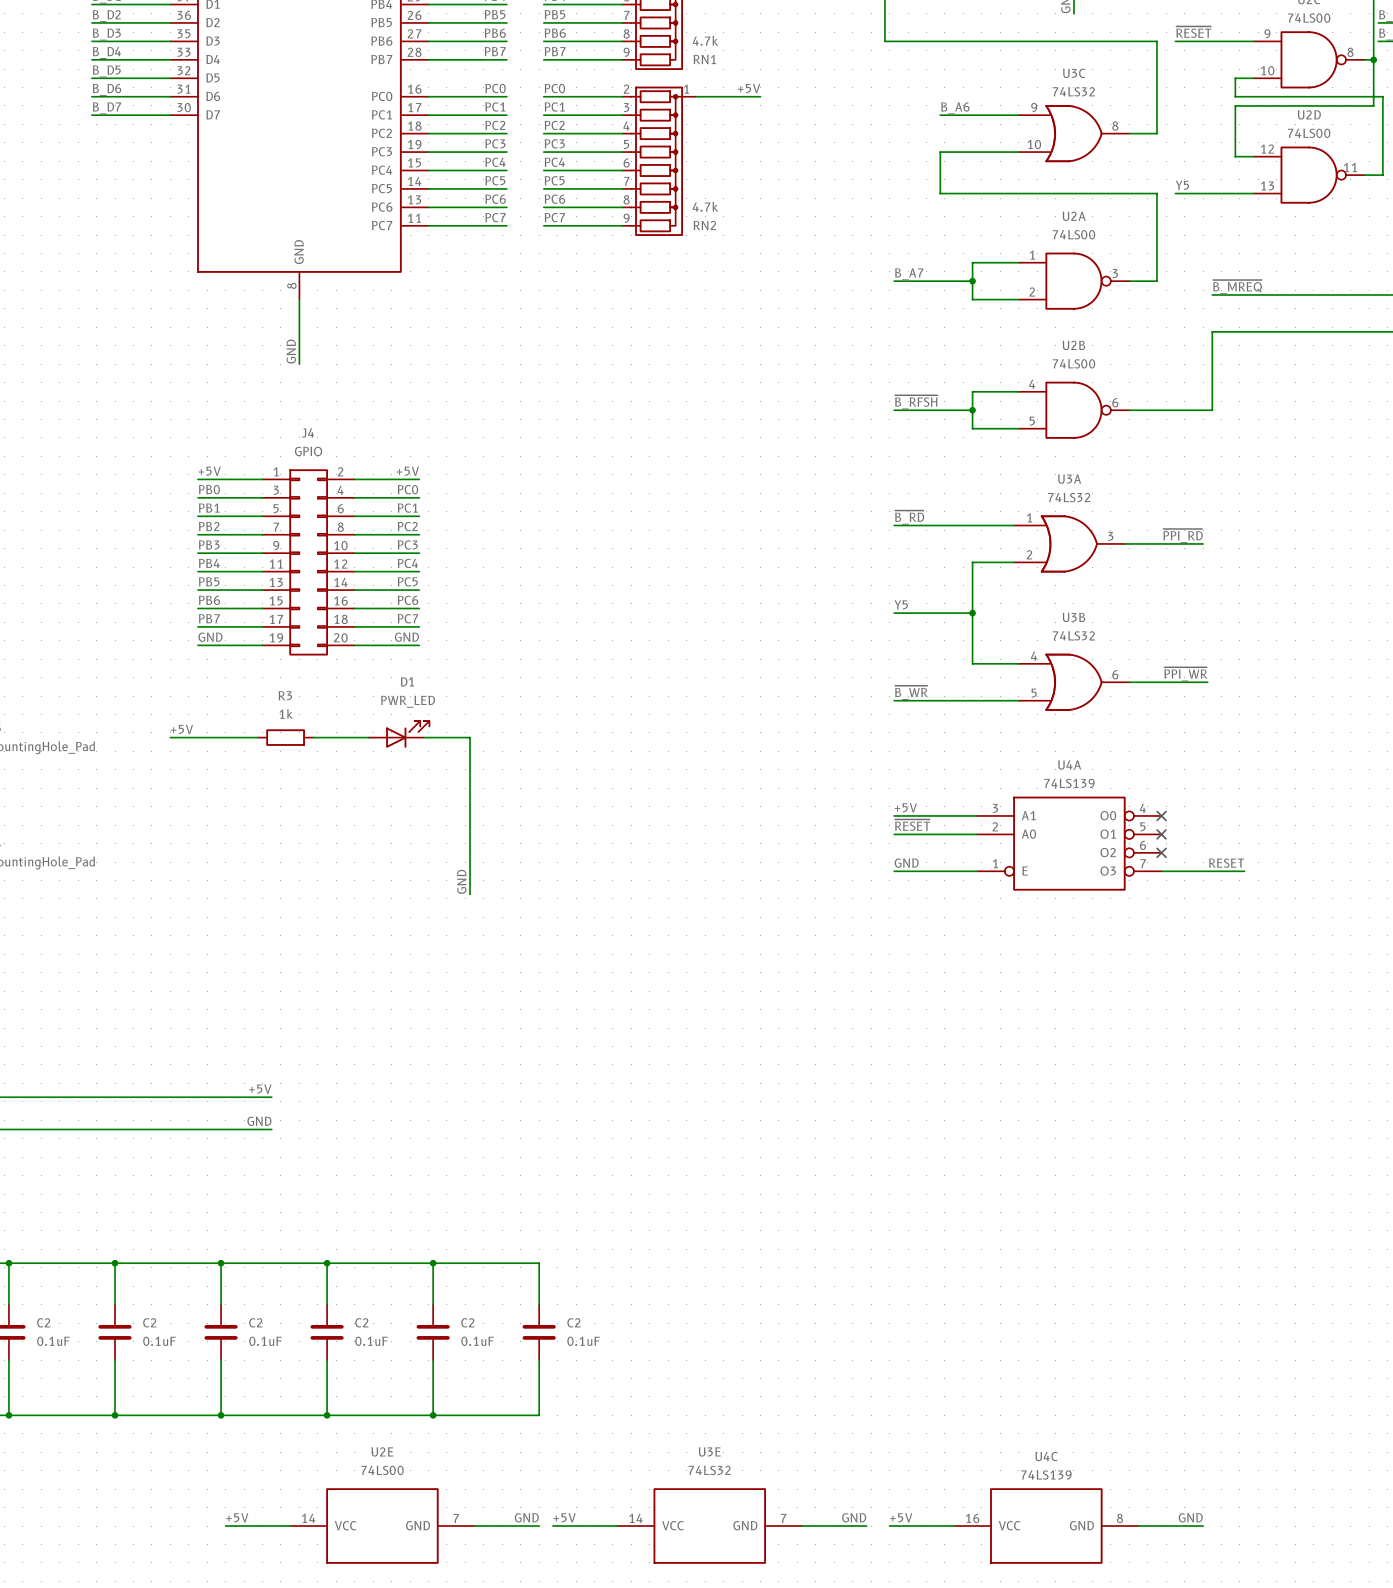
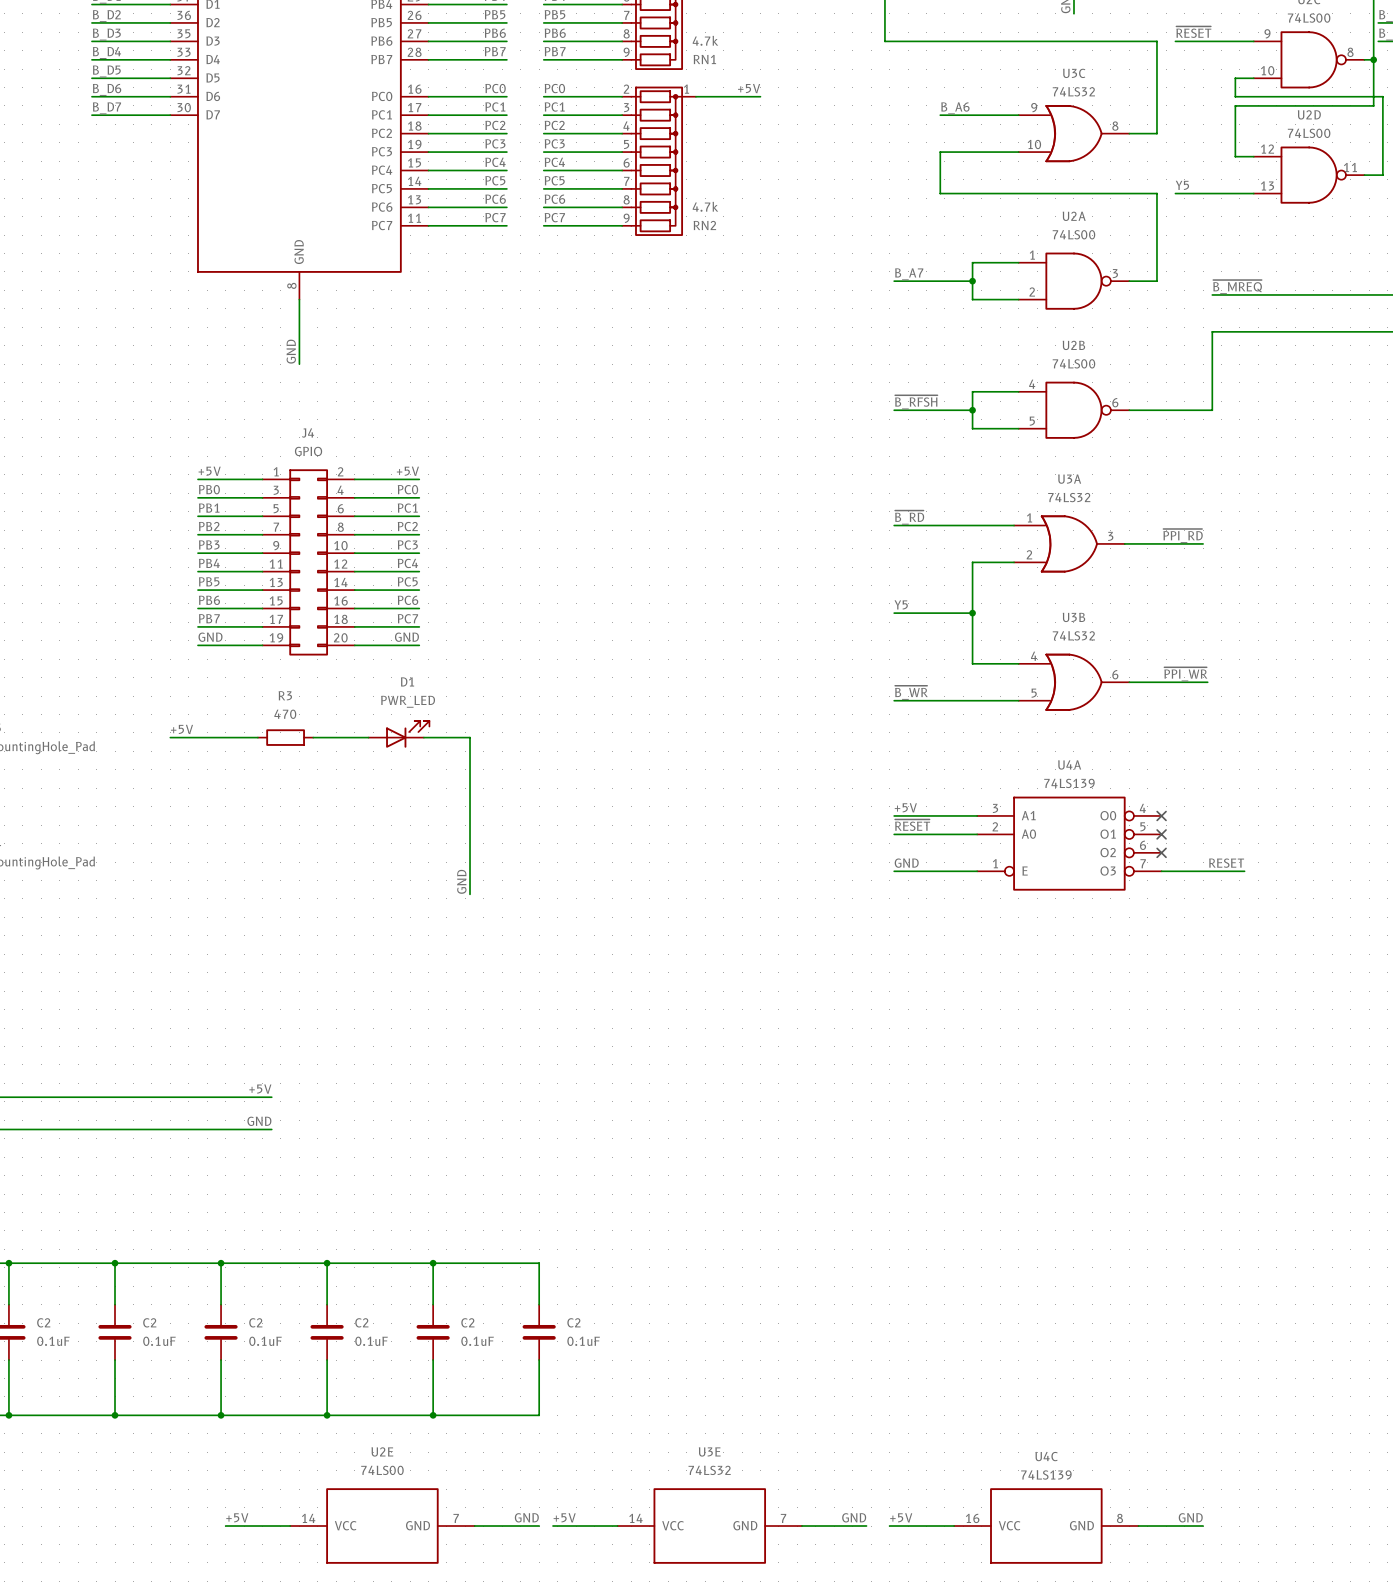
R3 value: 1k (286, 713) -> 470 (285, 714)

